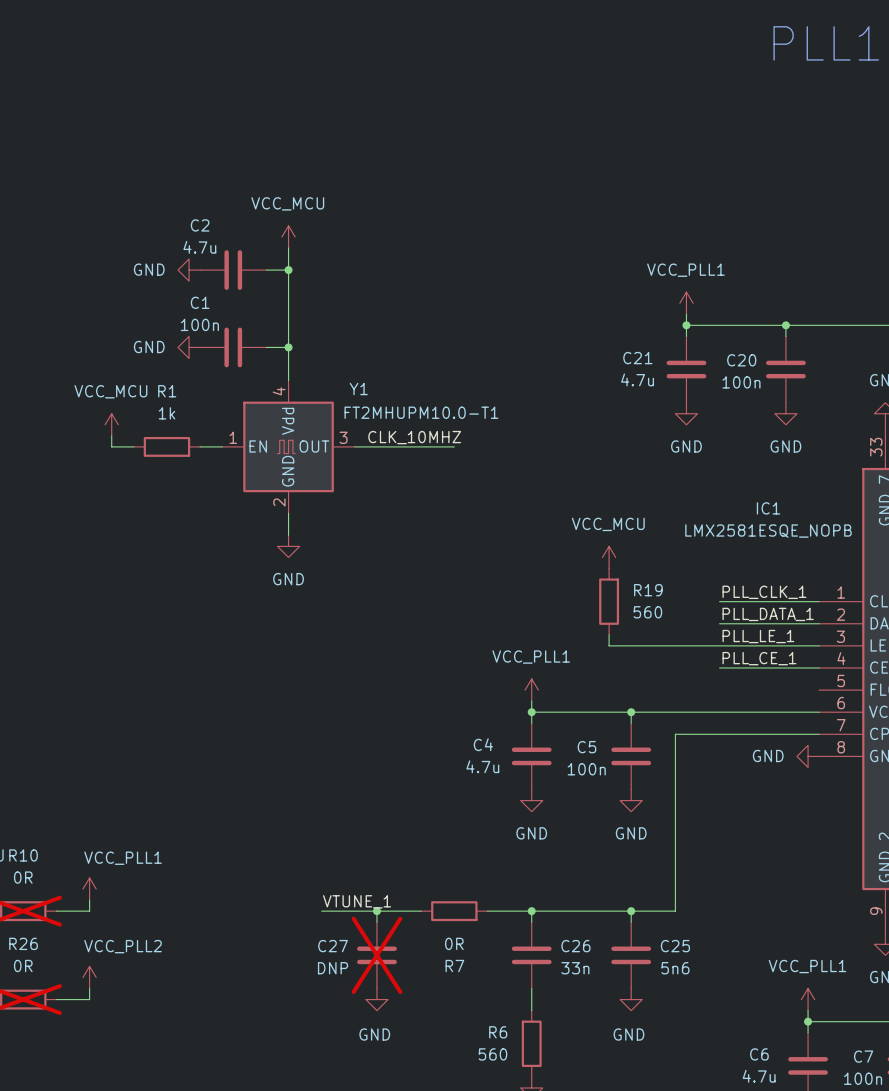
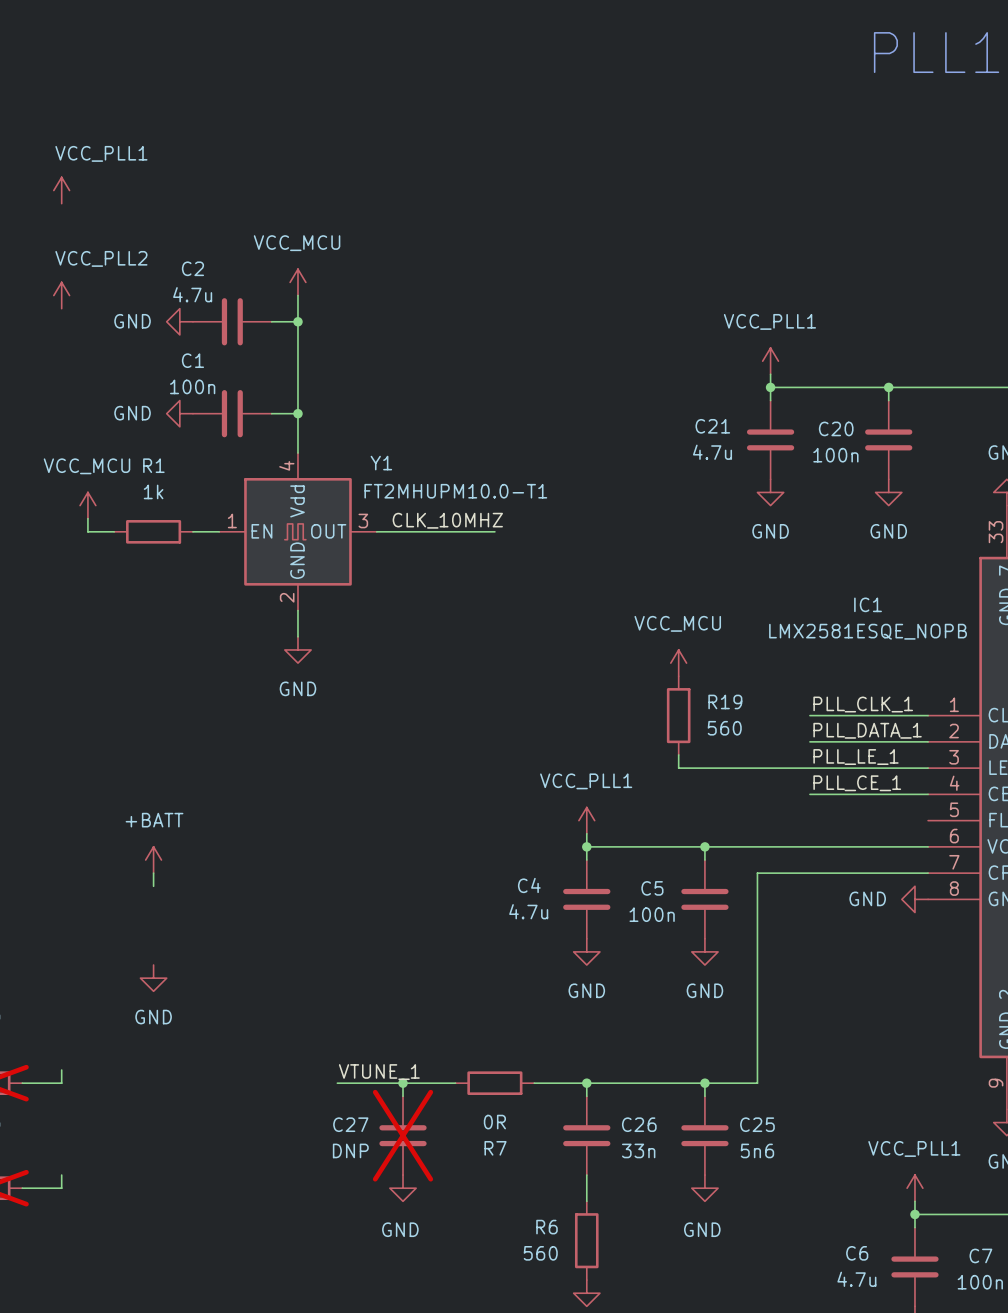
power symbol: none -> VCC_PLL1 (61, 190)
power symbol: none -> VCC_PLL2 (61, 295)
power symbol: none -> +BATT (153, 860)
wire: none -> (153, 873) (153, 886)
power symbol: none -> GND (153, 978)
power symbol: VCC_PLL1 (89, 889) -> none
power symbol: VCC_PLL2 (89, 977) -> none

